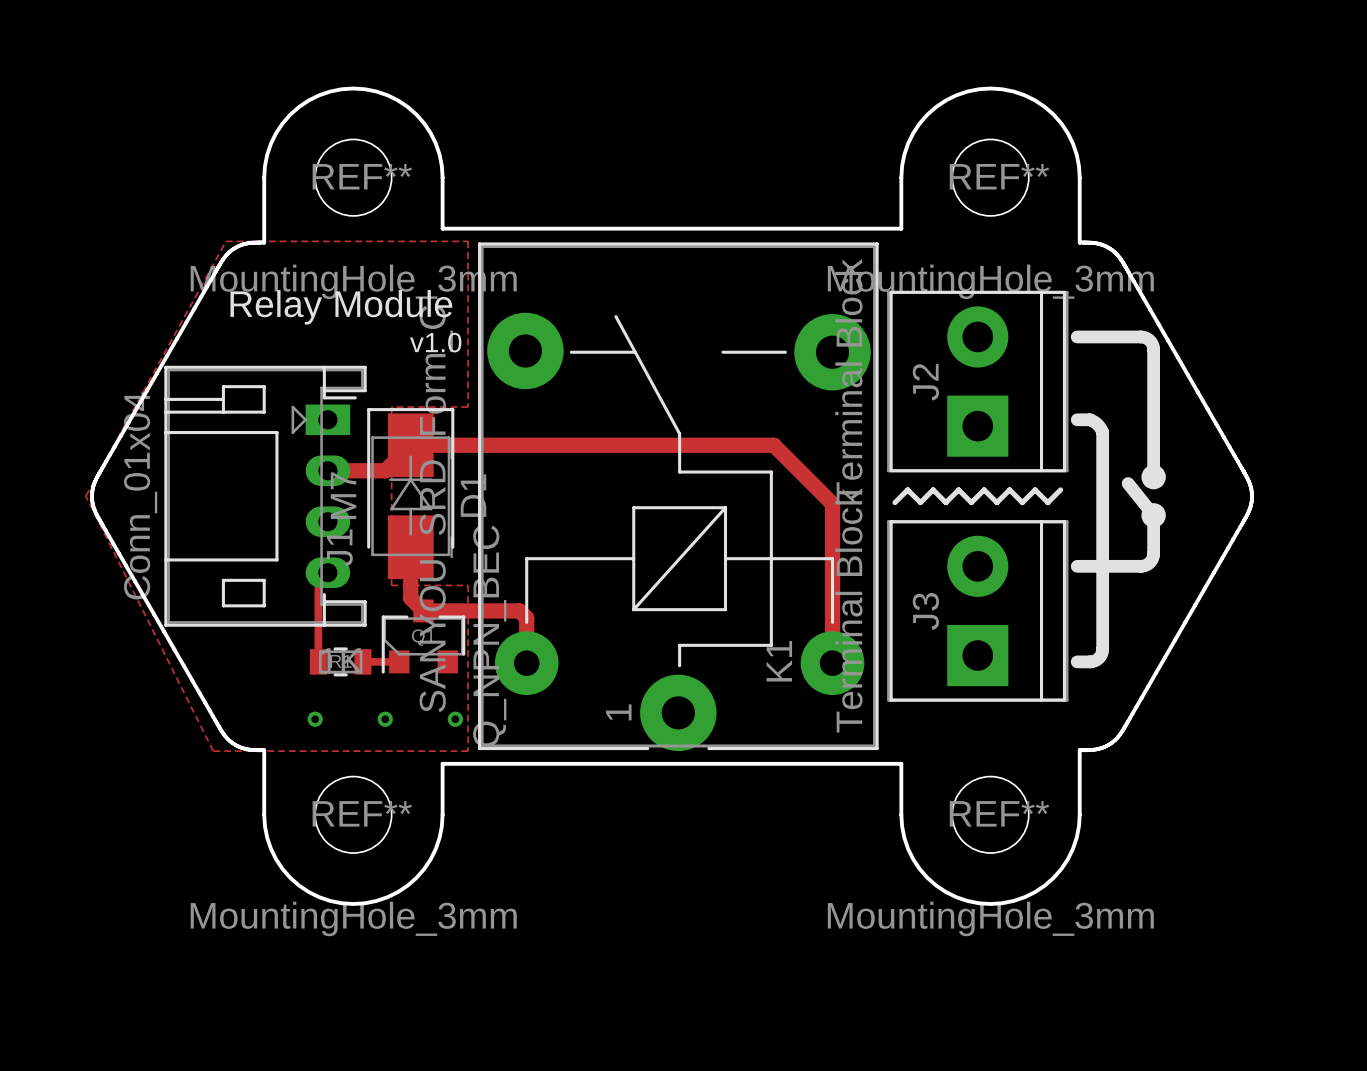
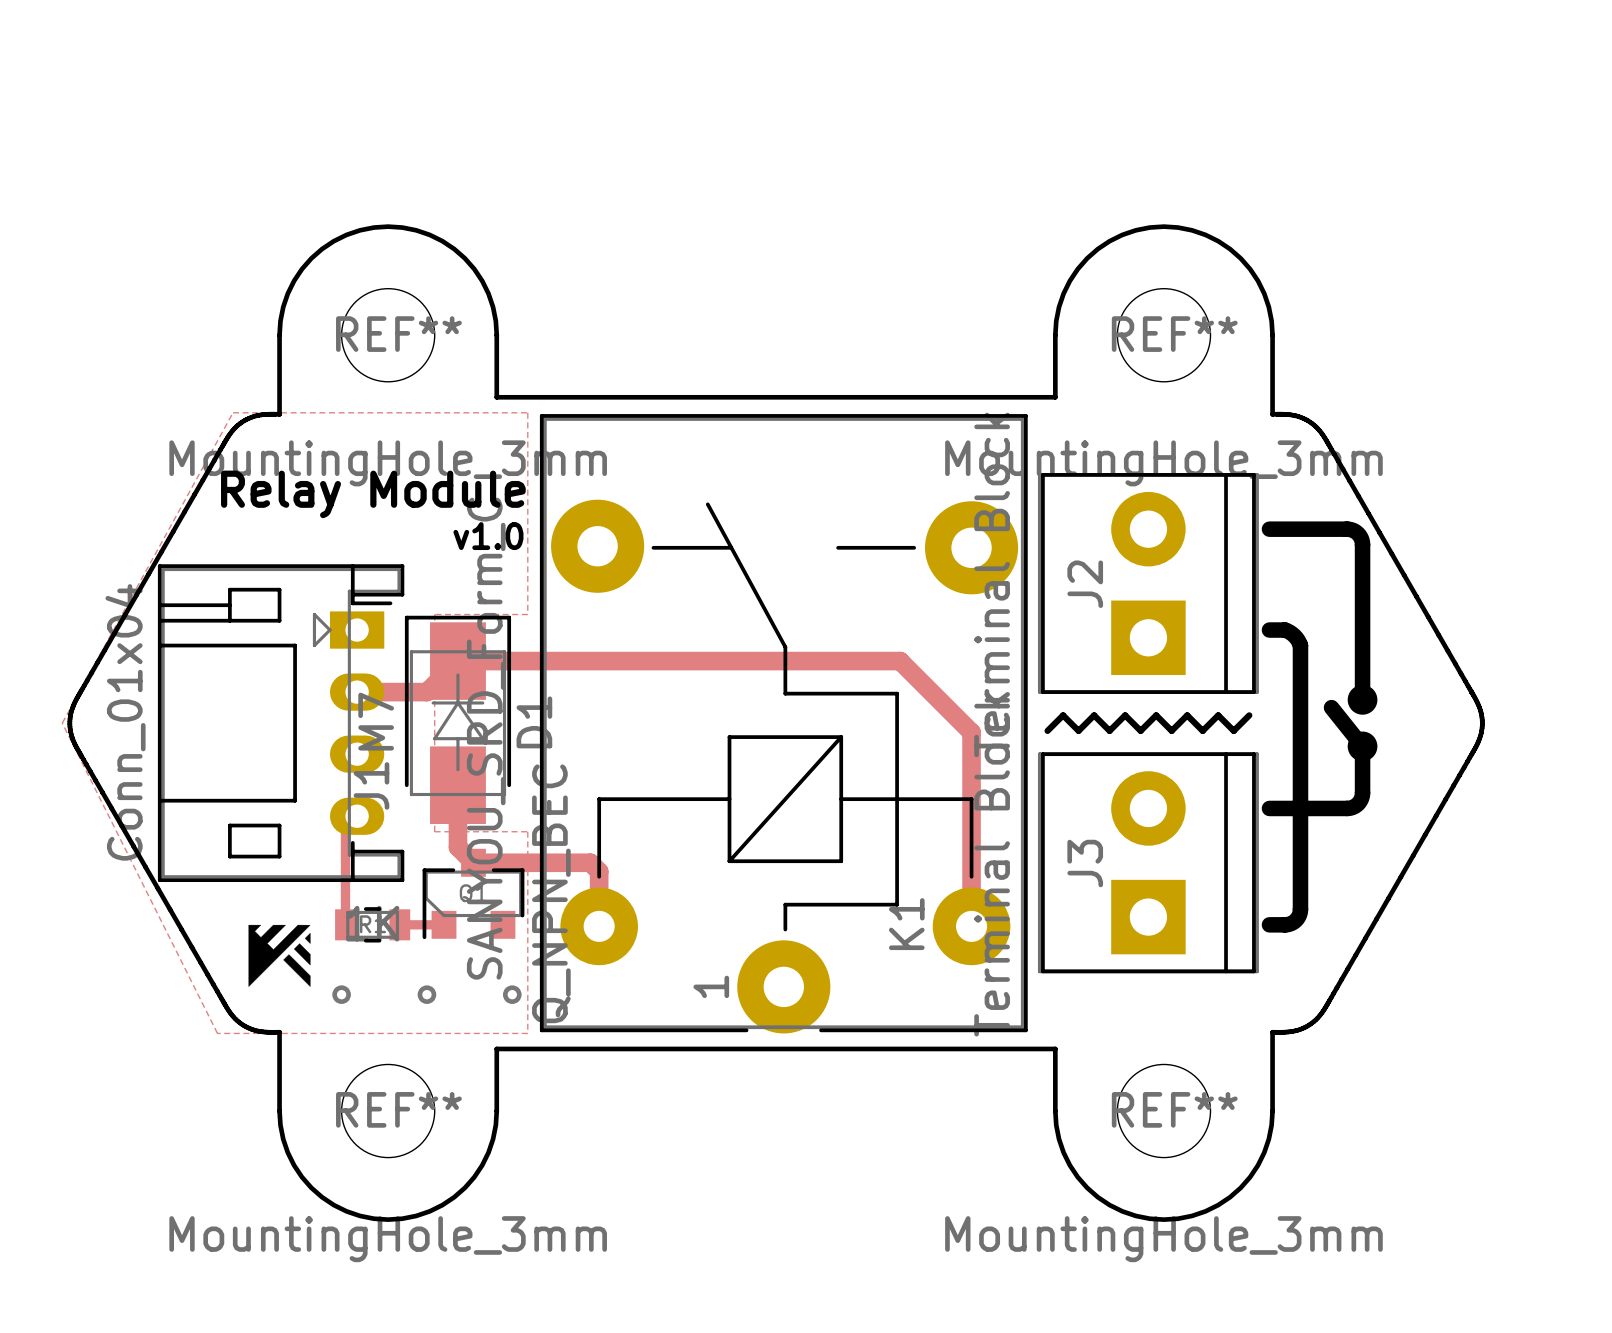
drawing: none -> [248, 924, 311, 987]

